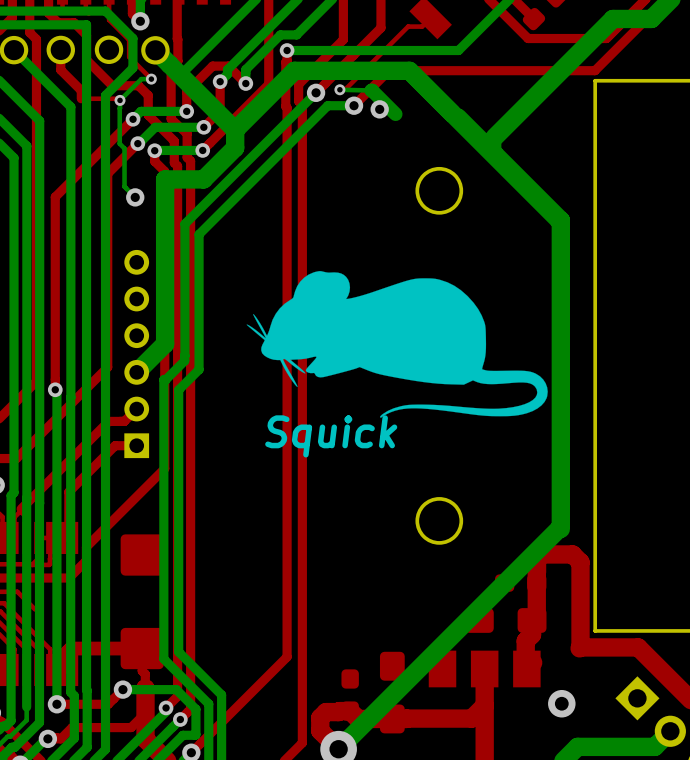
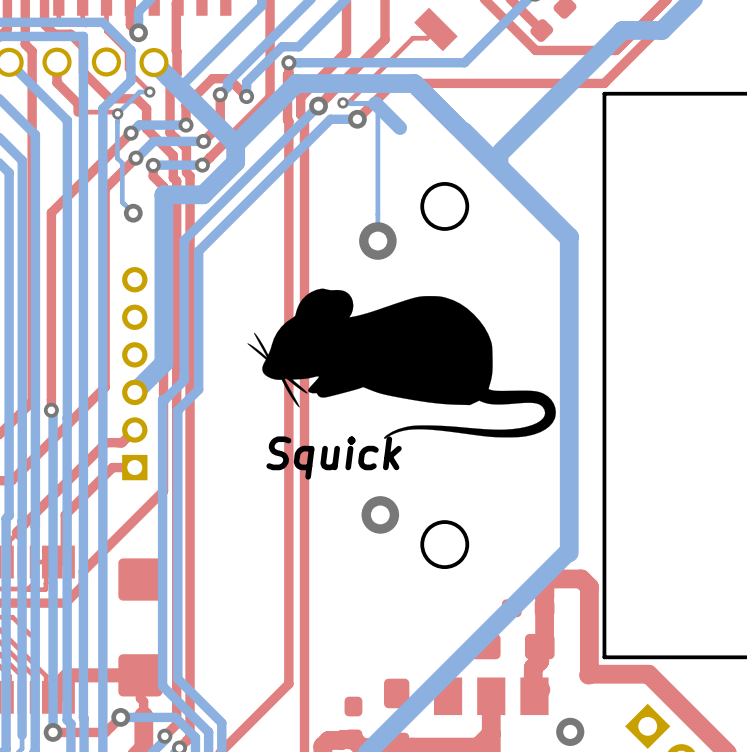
bottom track: none -> (342, 102) (375, 103) (377, 105) (377, 241)
via: (379, 109) -> none
via: none -> (377, 241)
via: none -> (380, 514)

